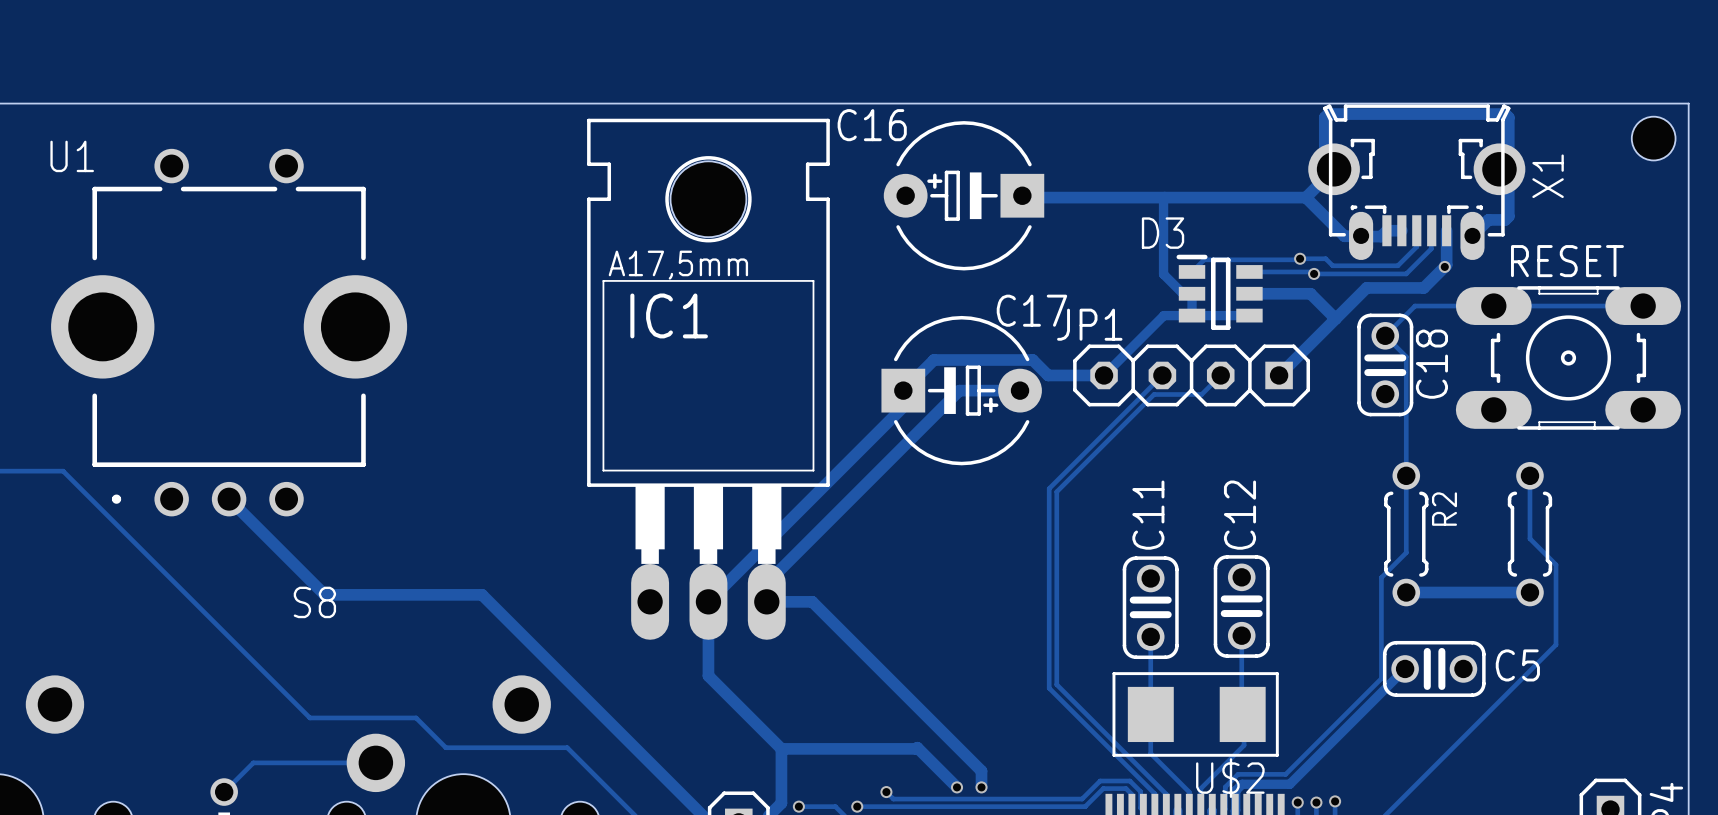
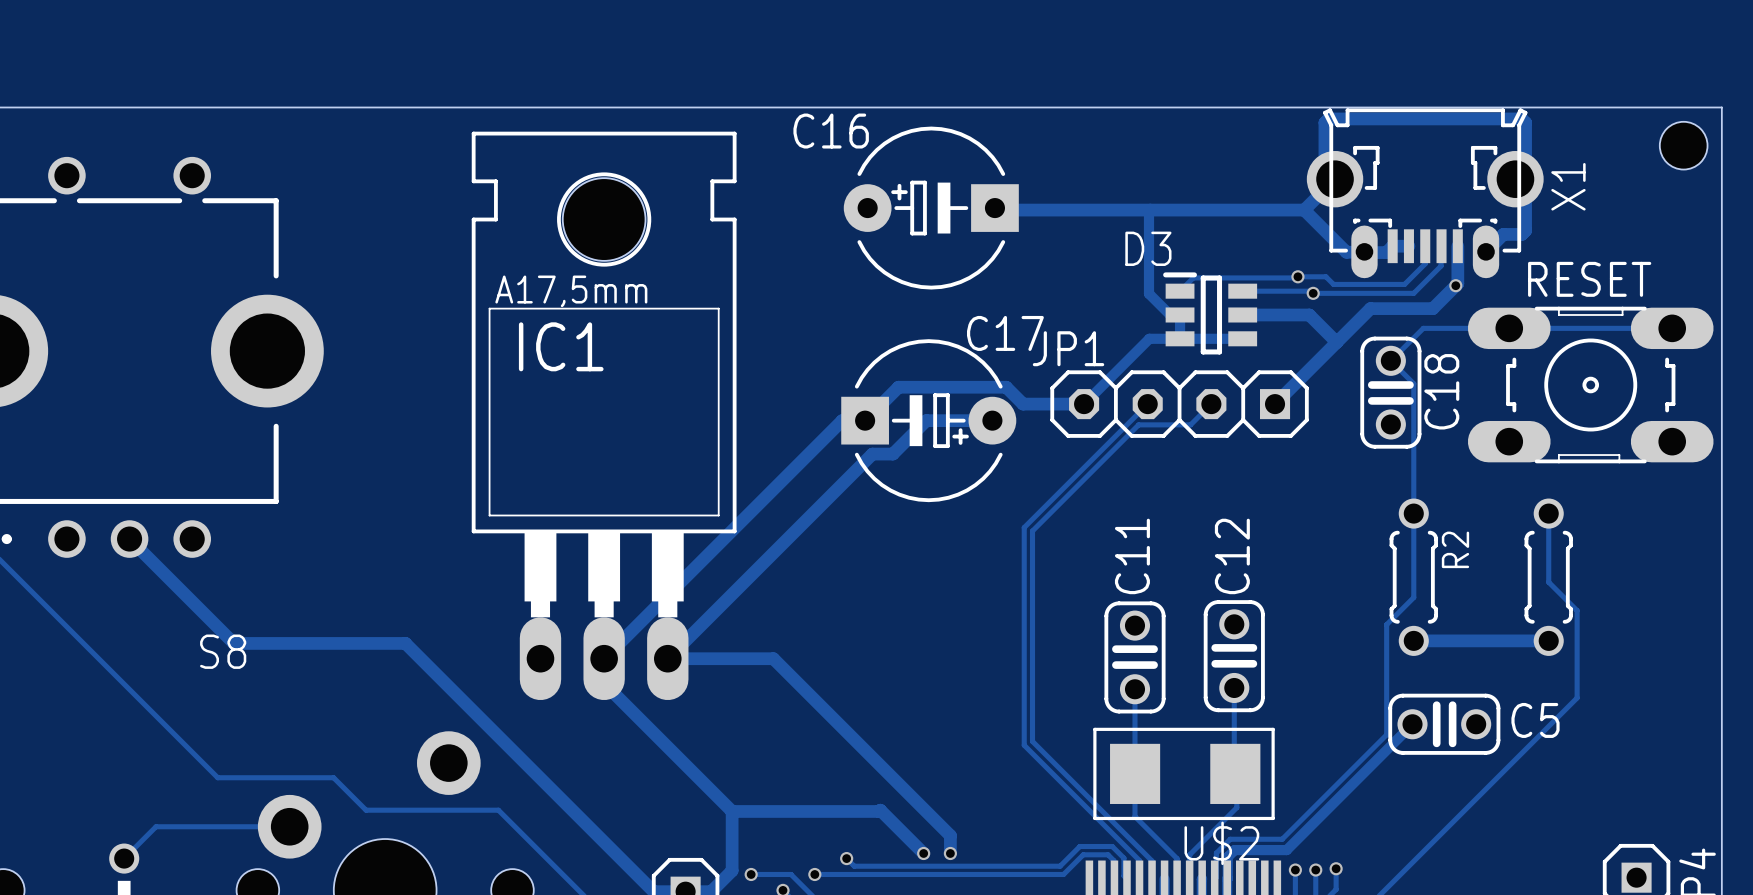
IC1 position: (708, 379) -> (604, 415)
track: (903, 390) (903, 406) (708, 601) (708, 675) -> (865, 420) (842, 420) (604, 658) (604, 683) (652, 731)
track: (928, 421) (766, 583) (766, 601) (812, 601) (819, 608) -> (892, 454) (872, 454) (667, 658) (773, 658)

